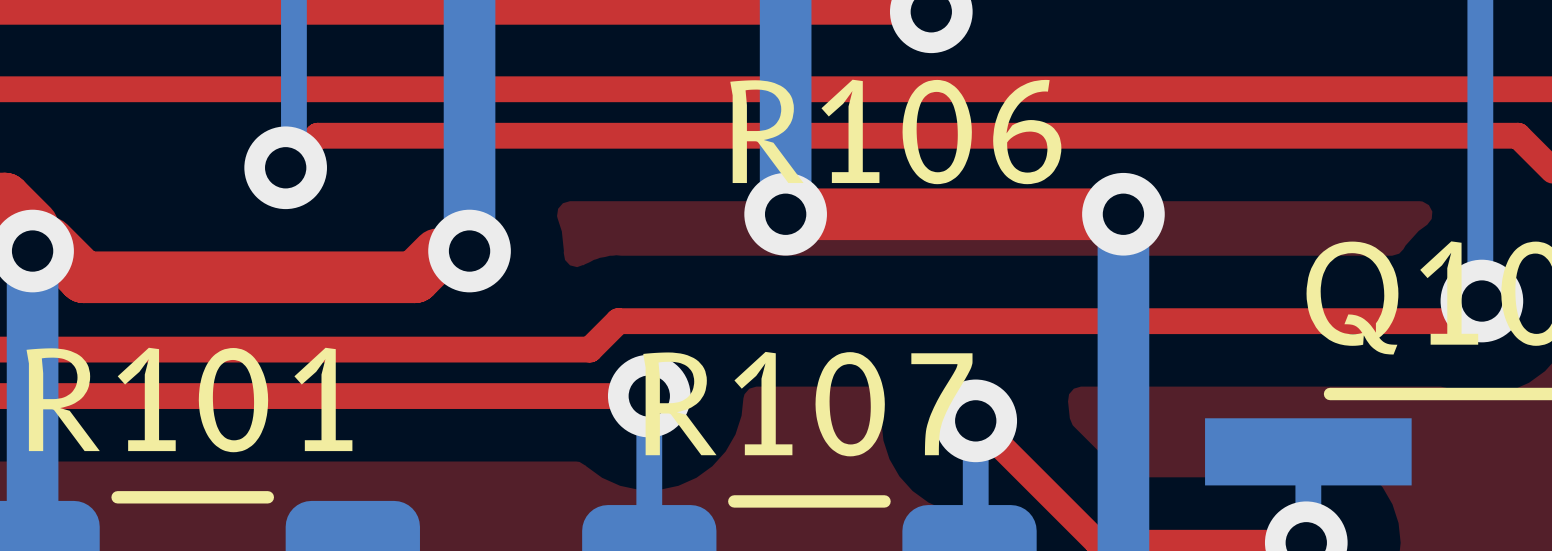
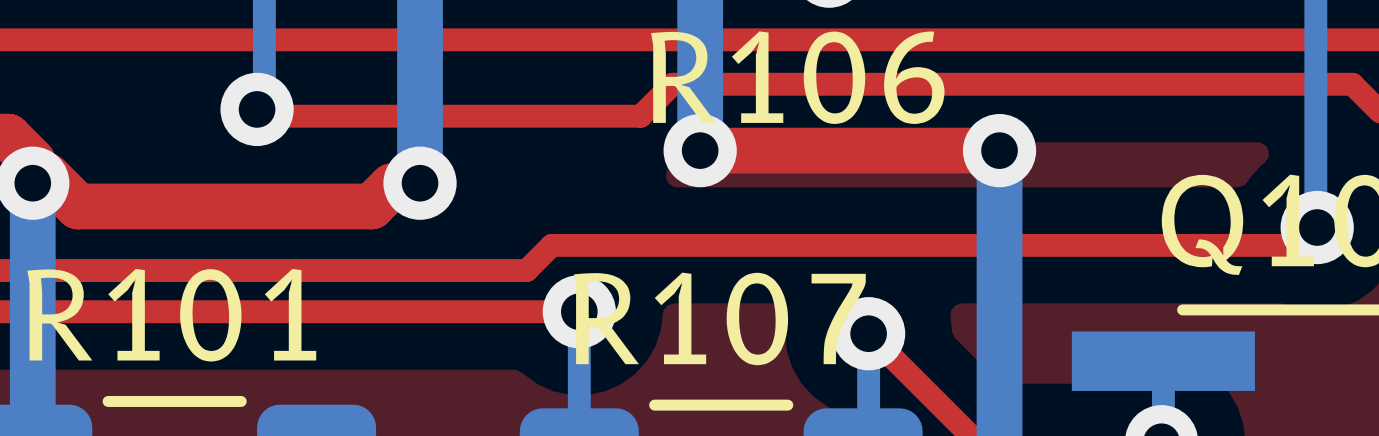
top track: (1521, 139) (1518, 135) (317, 135) (285, 167) -> (1352, 84) (672, 84) (640, 116) (263, 116) (257, 109)

